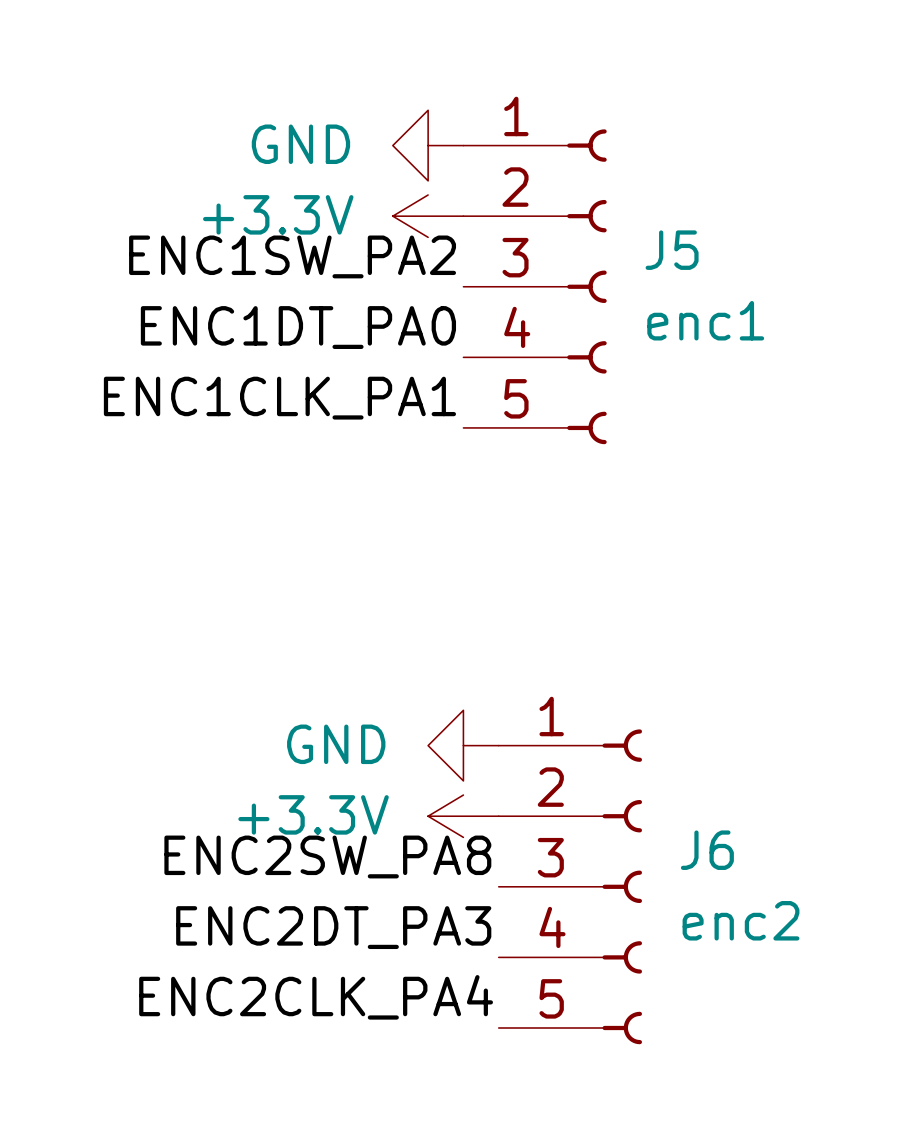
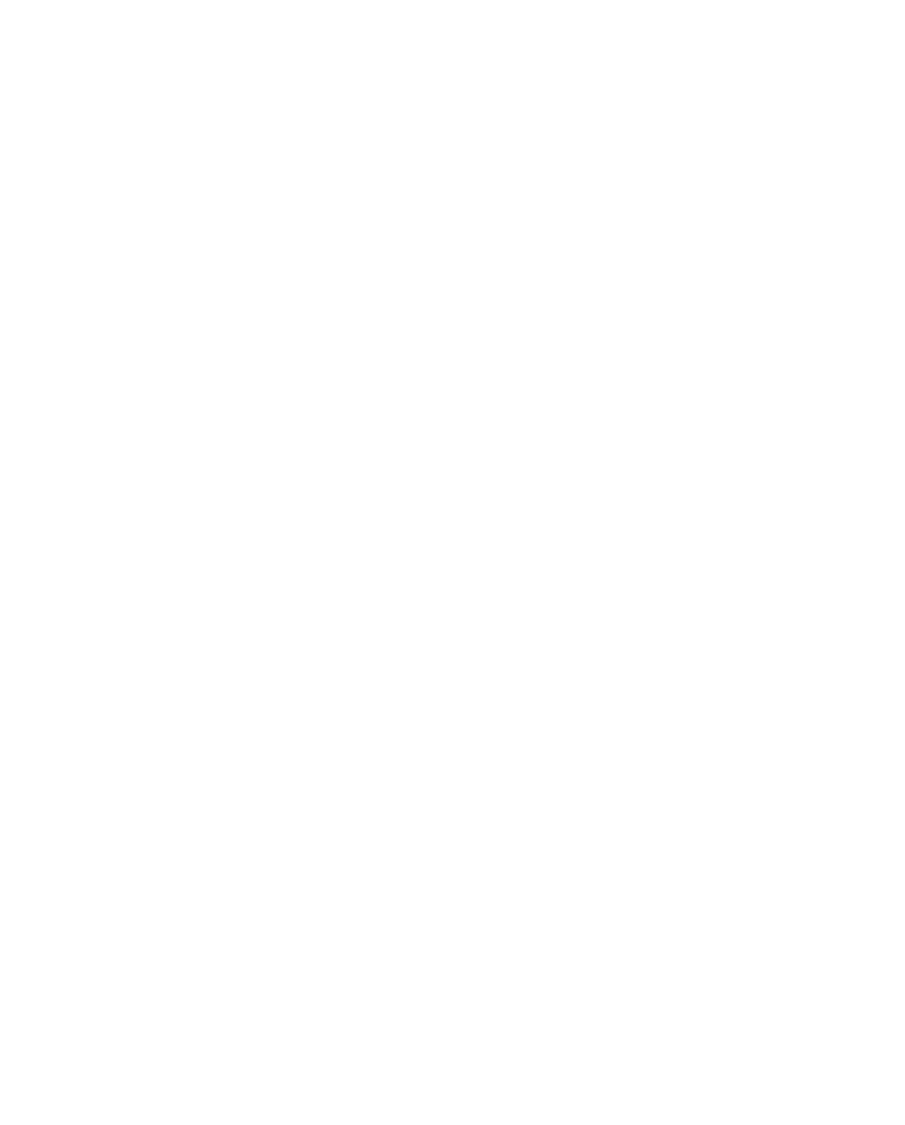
power symbol: GND (428, 145) -> none
power symbol: +3.3V (428, 216) -> none
label: ENC1SW_PA2 (292, 256) -> none
J5: enc1 (535, 286) -> none
label: ENC1DT_PA0 (298, 327) -> none
label: ENC1CLK_PA1 (279, 398) -> none
power symbol: GND (463, 745) -> none
power symbol: +3.3V (463, 816) -> none
label: ENC2SW_PA8 (327, 856) -> none
J6: enc2 (570, 886) -> none
label: ENC2DT_PA3 (333, 927) -> none
label: ENC2CLK_PA4 (316, 997) -> none

